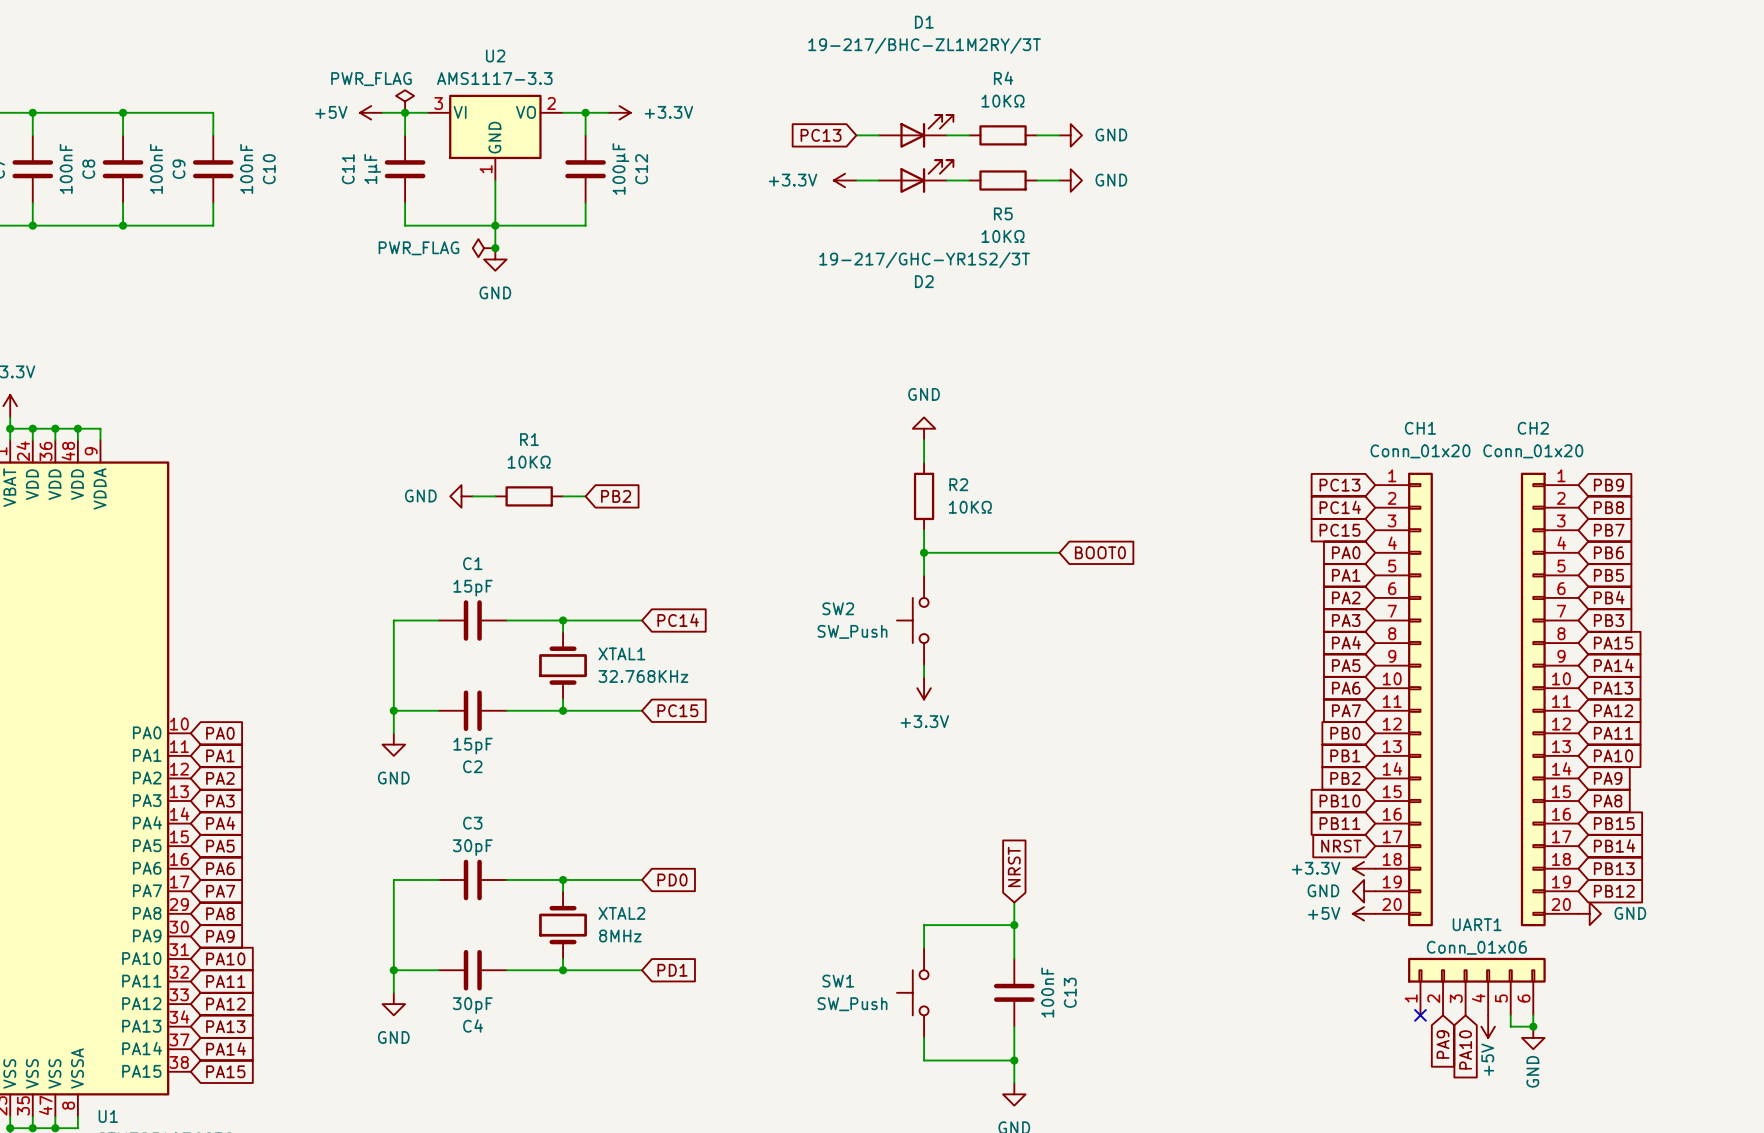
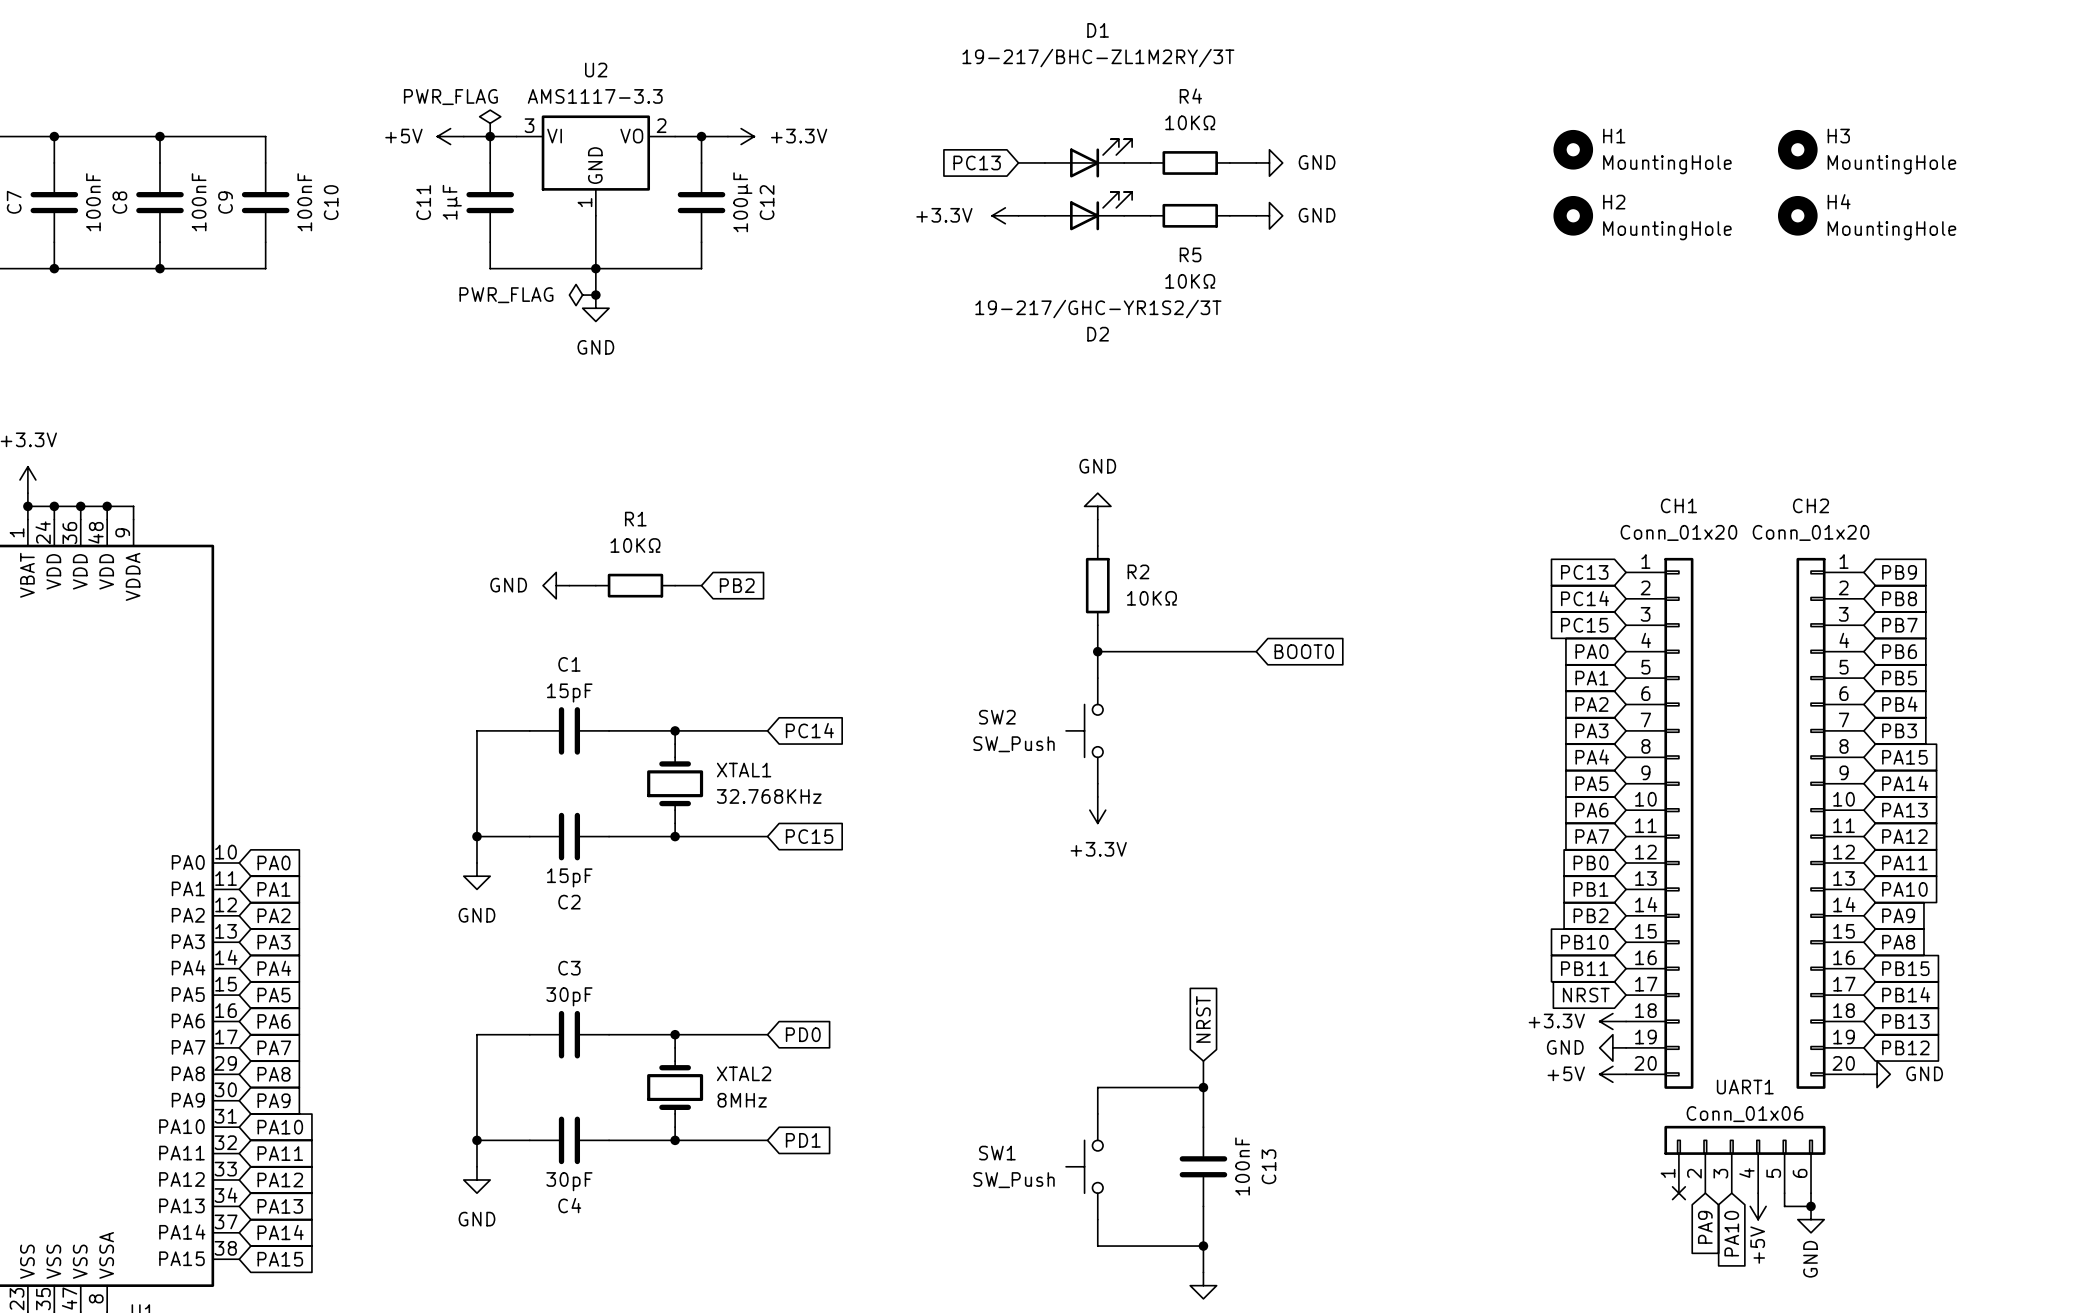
H1: none -> MountingHole (1573, 149)
H3: none -> MountingHole (1797, 149)
H2: none -> MountingHole (1573, 215)
H4: none -> MountingHole (1797, 215)

